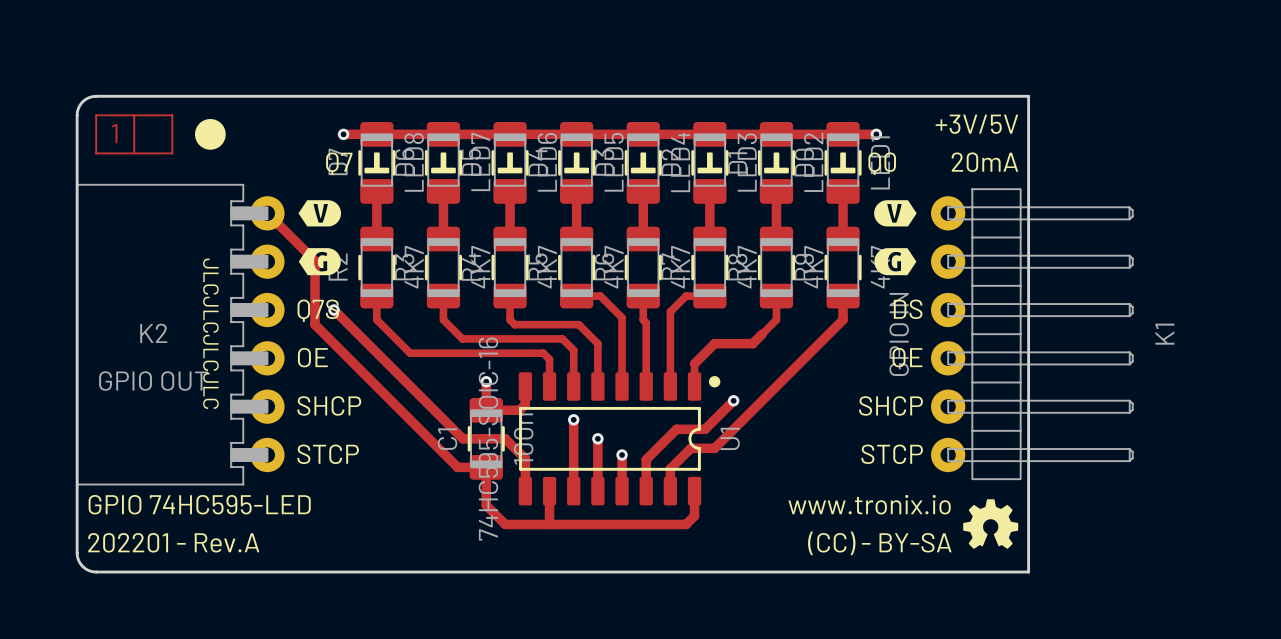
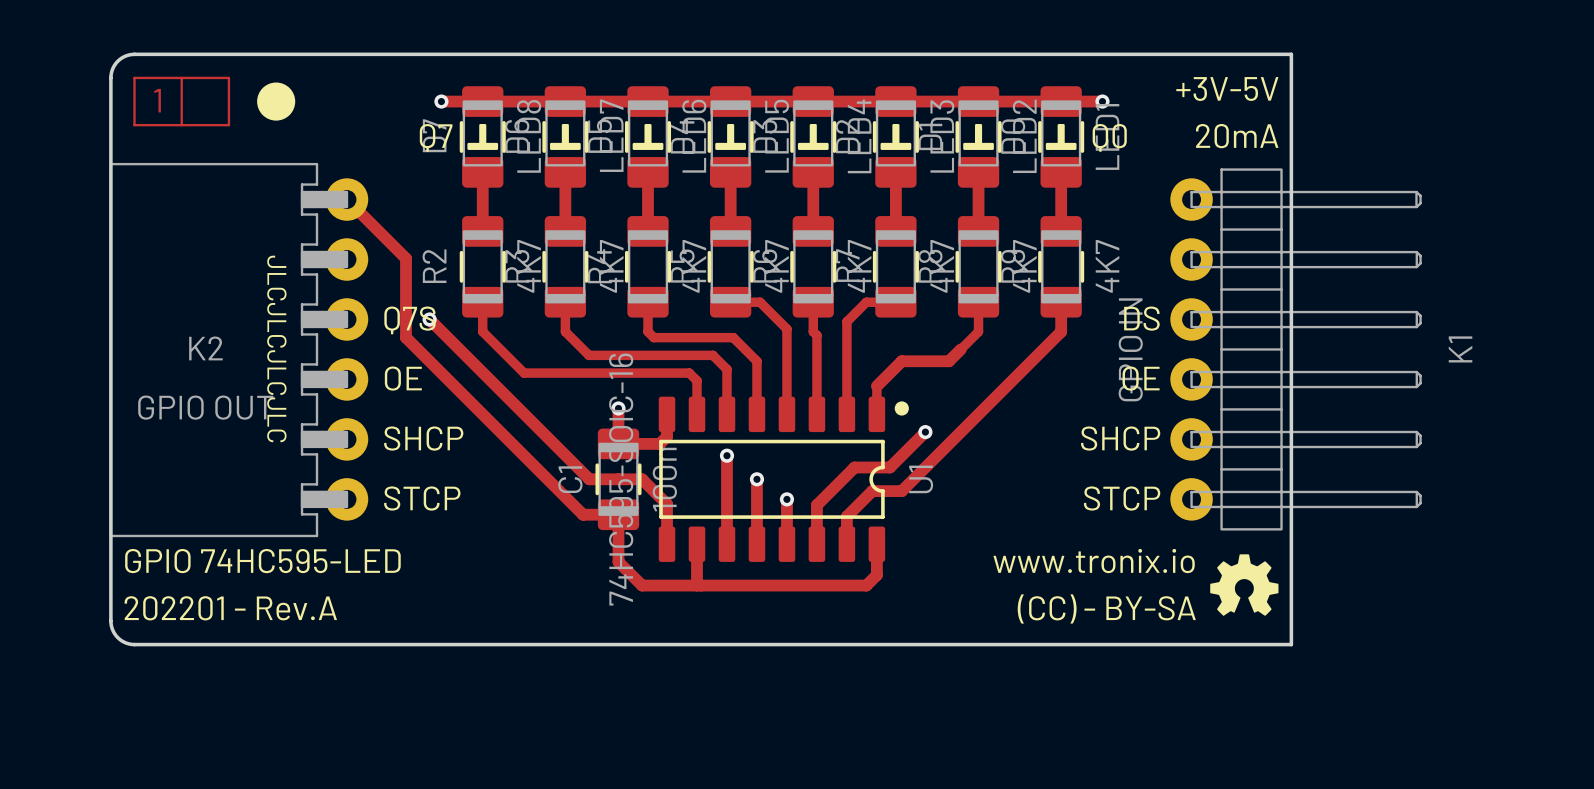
text: +3V/5V (976, 124) -> +3V-5V (1227, 89)
drawing: [298, 200, 342, 276] -> none
drawing: [874, 200, 917, 276] -> none

